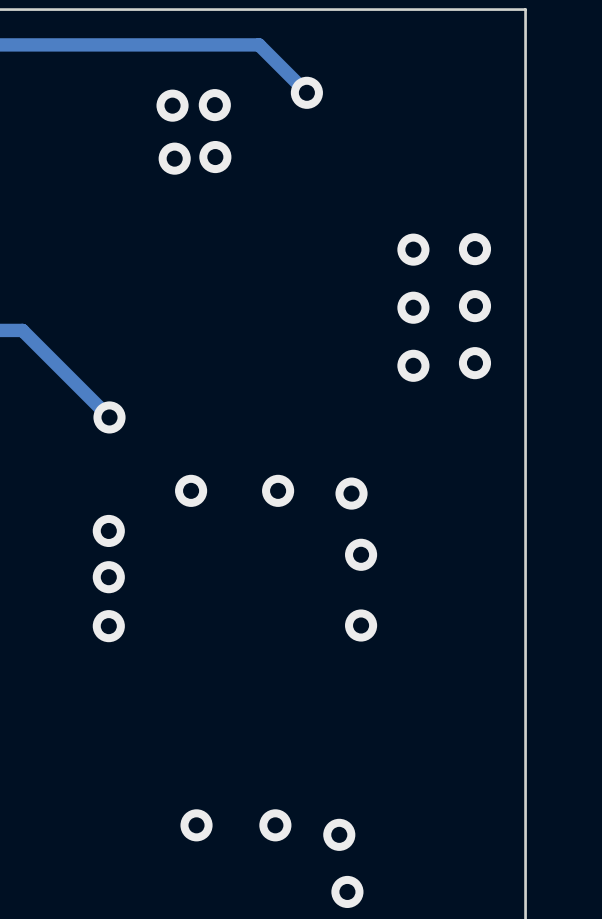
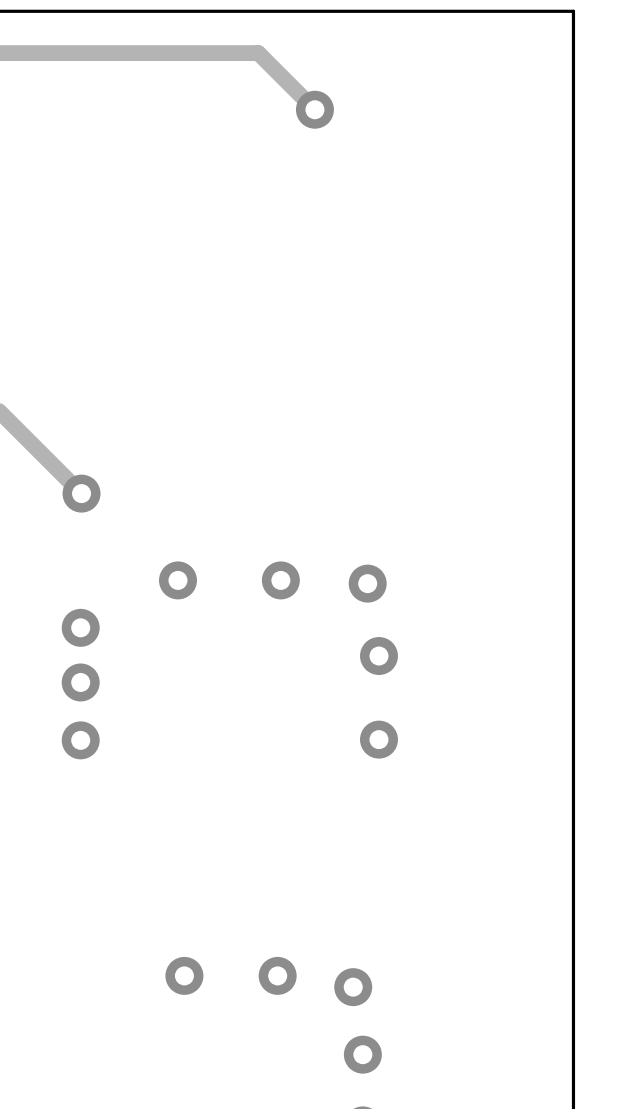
via: (172, 105) -> none
via: (214, 105) -> none
via: (215, 157) -> none
via: (174, 158) -> none
via: (413, 249) -> none
via: (474, 249) -> none
via: (474, 306) -> none
via: (413, 307) -> none
via: (474, 363) -> none
via: (413, 365) -> none

